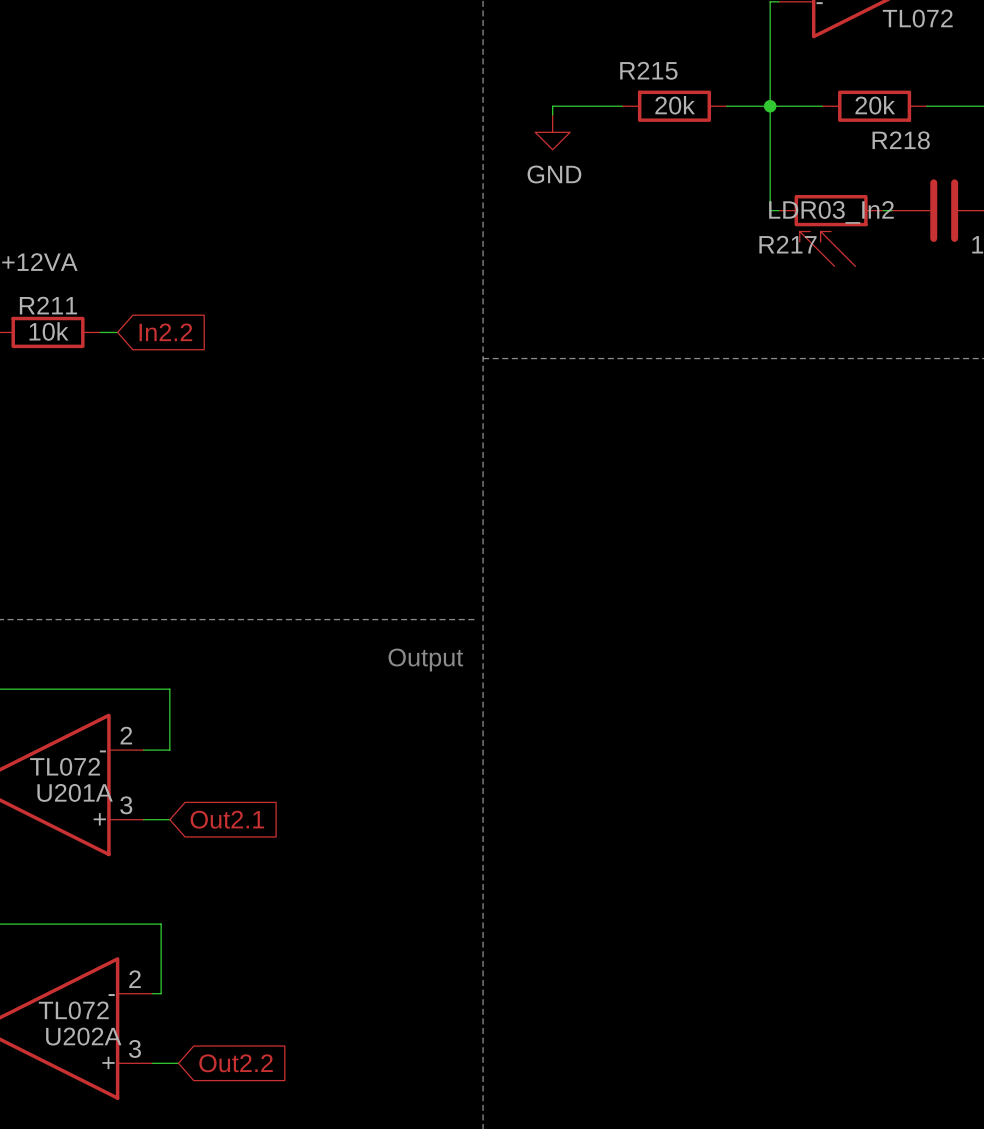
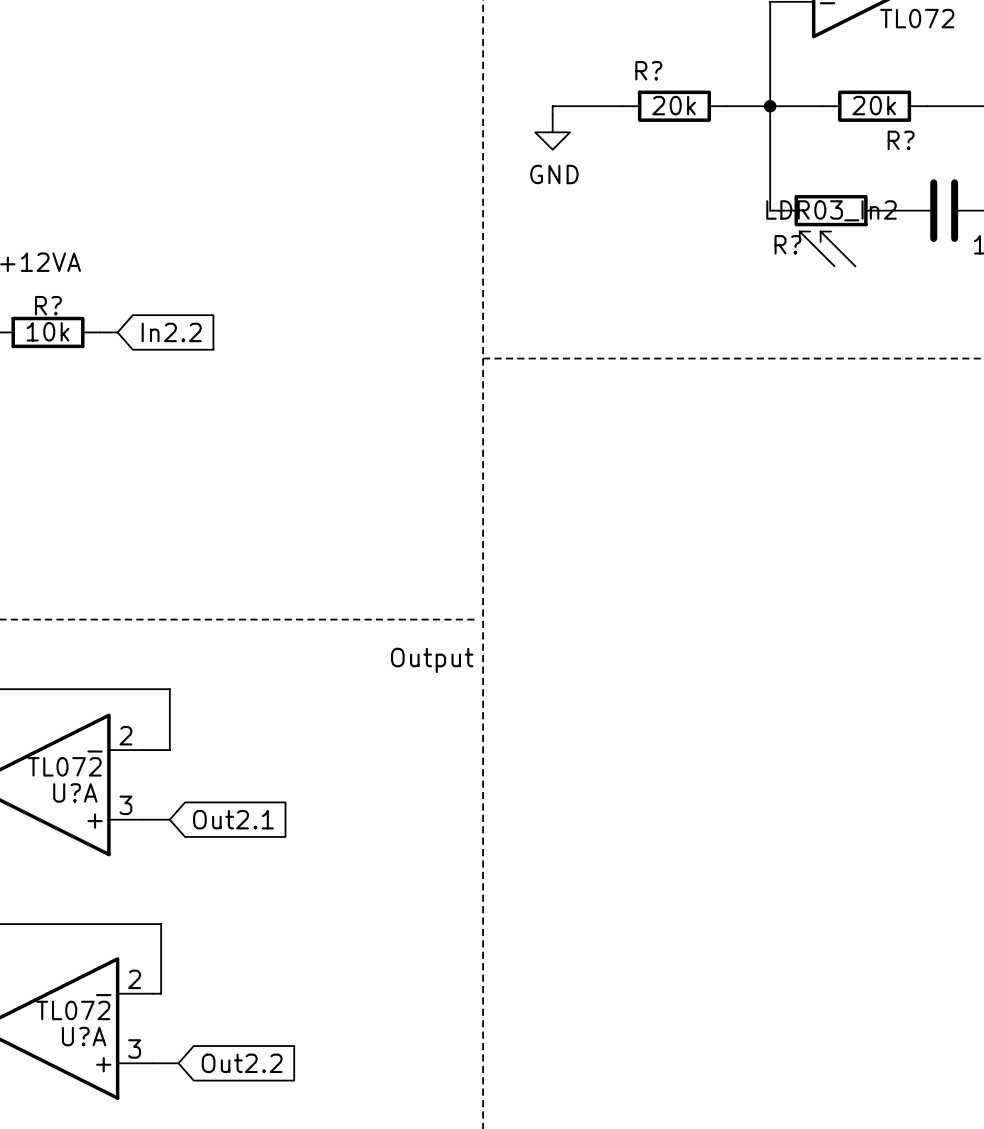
R215 name: R215 (648, 70) -> R? (648, 70)
R218 name: R218 (901, 140) -> R? (901, 140)
R217 name: R217 (787, 244) -> R? (787, 244)
R211 name: R211 (48, 305) -> R? (48, 305)
U201A name: U201A (75, 792) -> U?A (75, 792)
U202A name: U202A (83, 1036) -> U?A (84, 1036)

